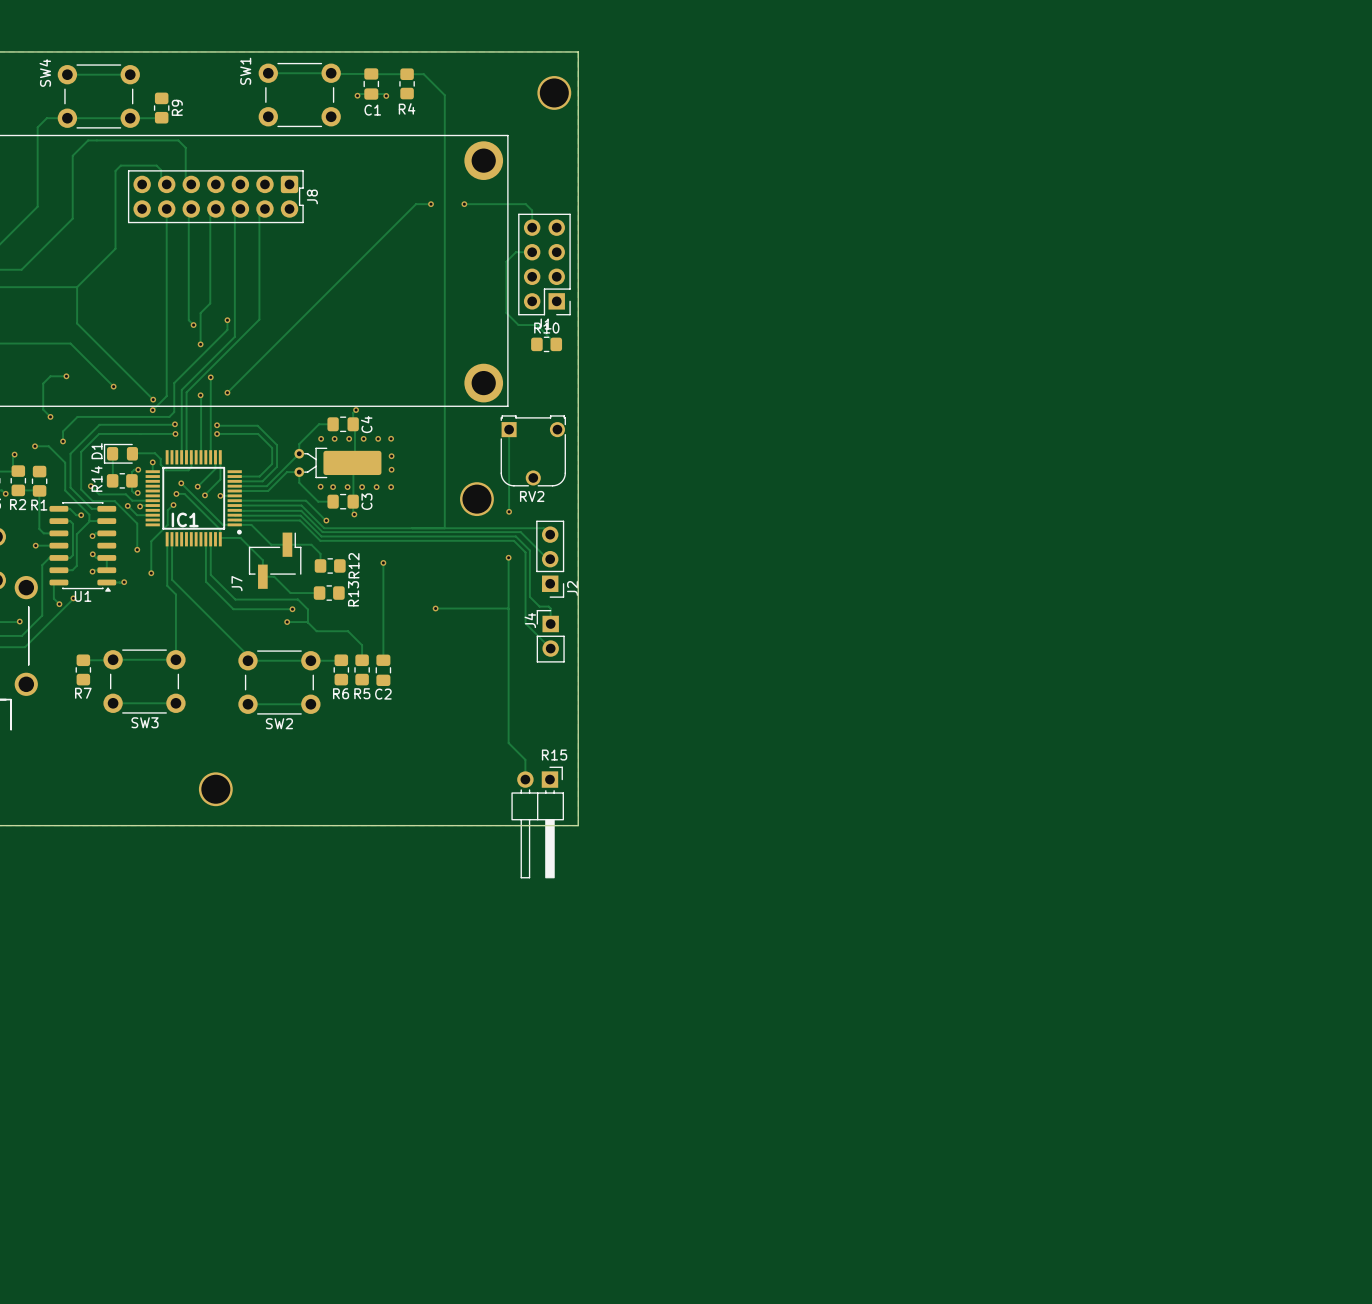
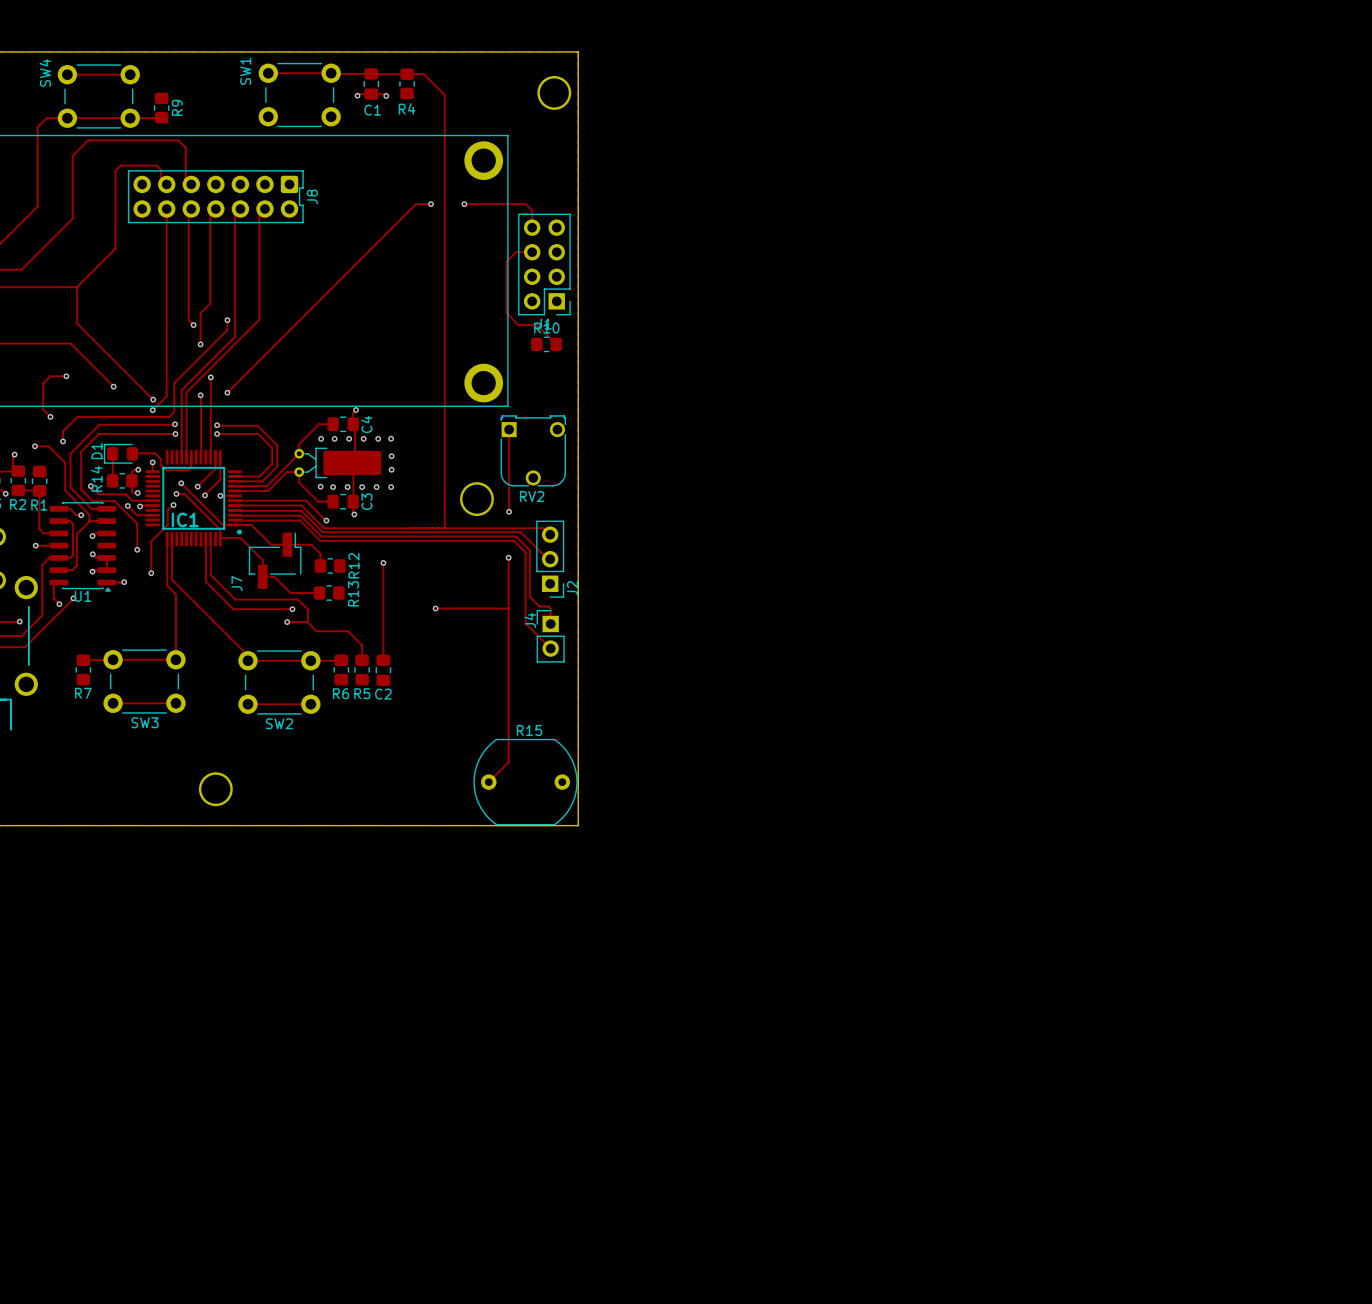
track: (508, 743) (525, 759) (525, 779) -> (508, 743) (508, 762) (488, 782)
R15 name position: R15 (554, 755) -> R15 (529, 730)
R15 footprint: [511, 766, 564, 879] -> [473, 738, 578, 826]

